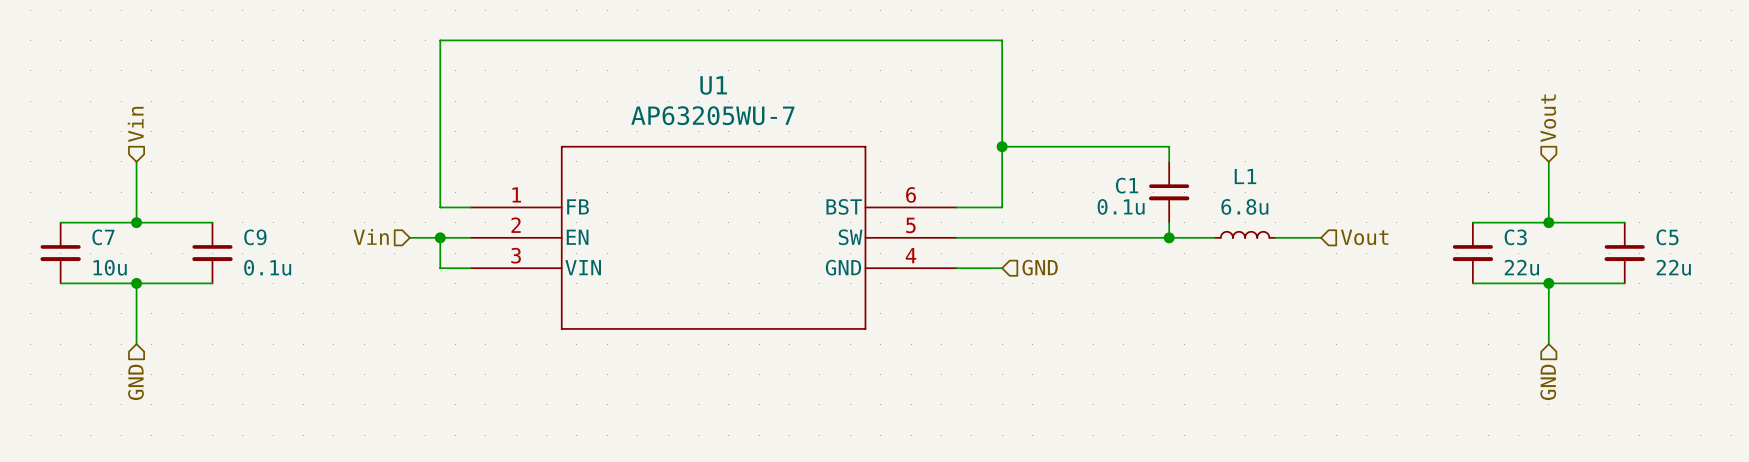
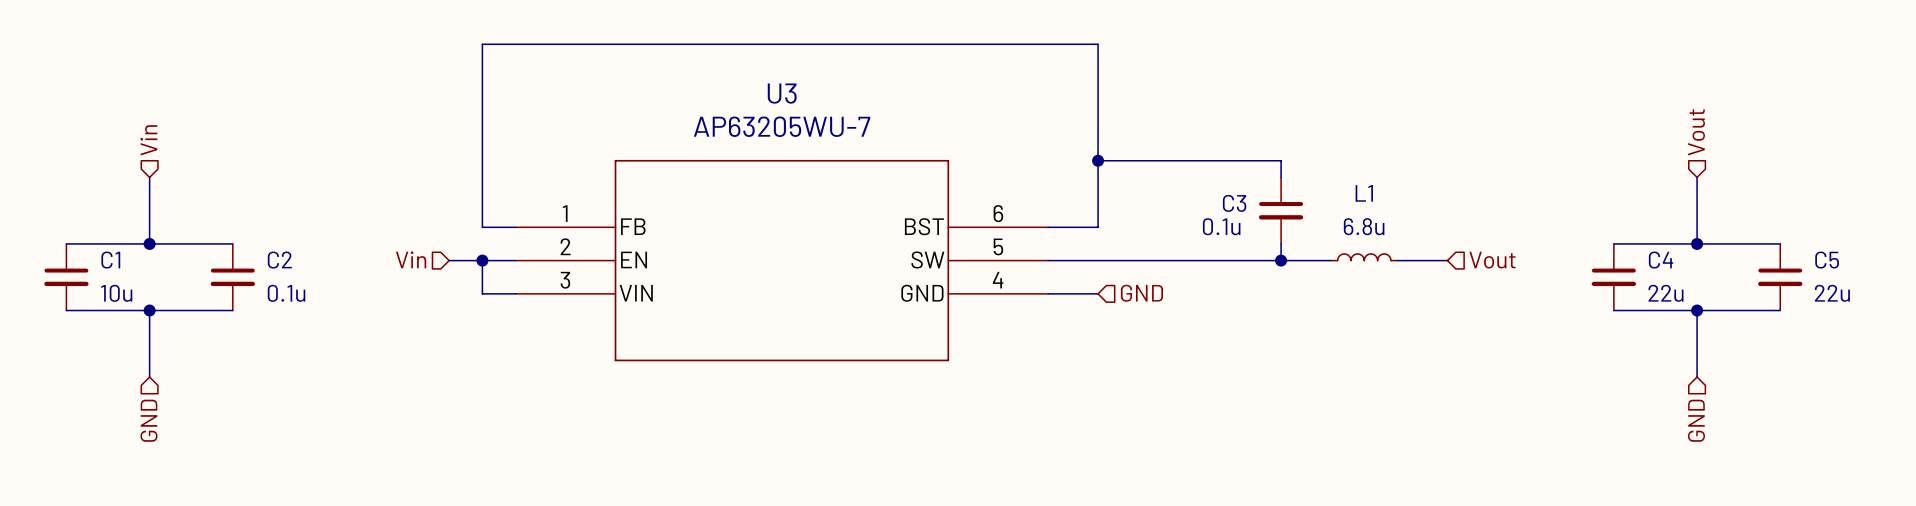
U1 name: U1 (713, 85) -> U3 (782, 93)
C1 name: C1 (1127, 185) -> C3 (1234, 203)
C7 name: C7 (103, 237) -> C1 (110, 260)
C9 name: C9 (255, 237) -> C2 (279, 260)
C3 name: C3 (1515, 237) -> C4 (1661, 260)

